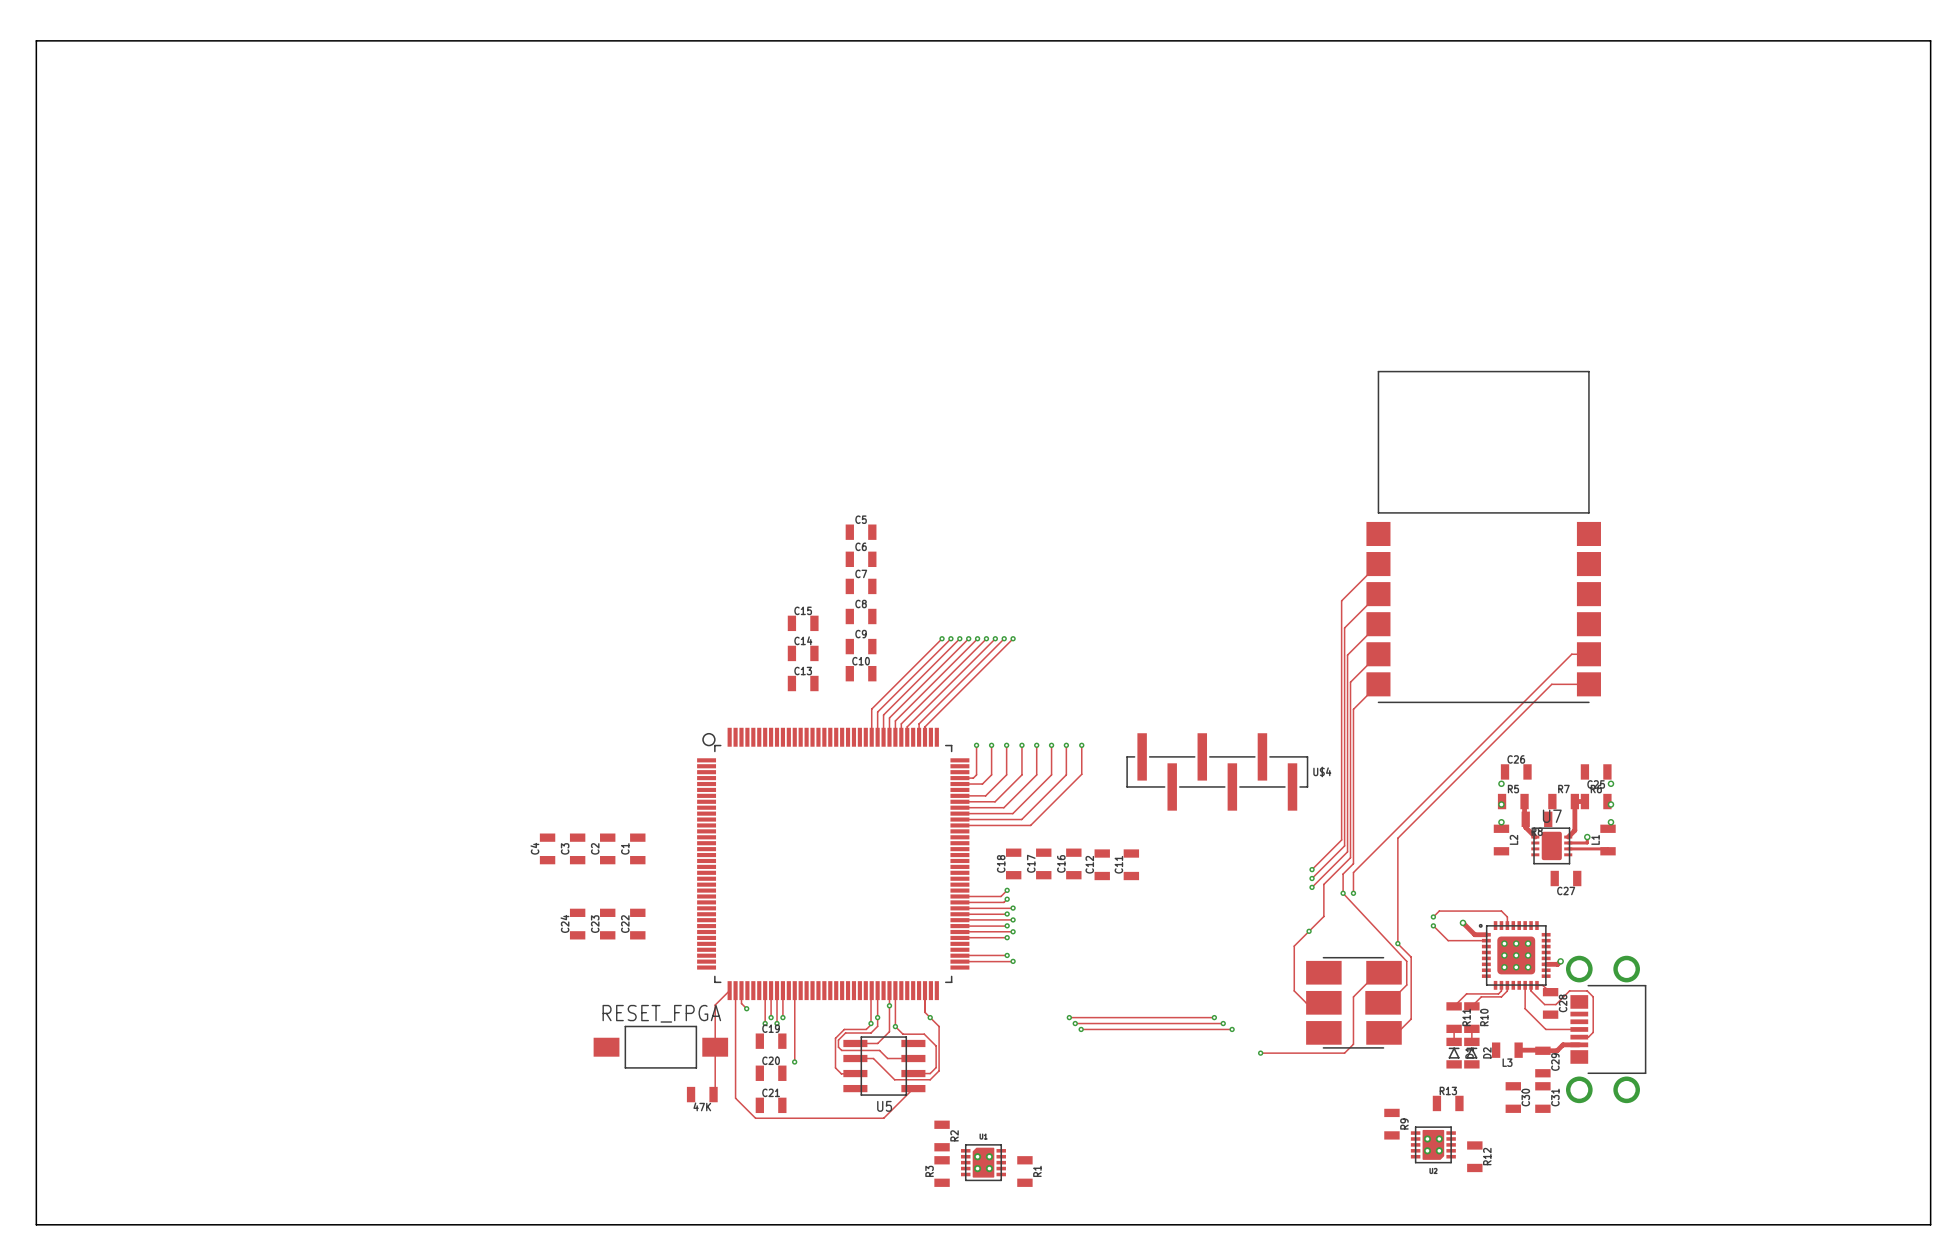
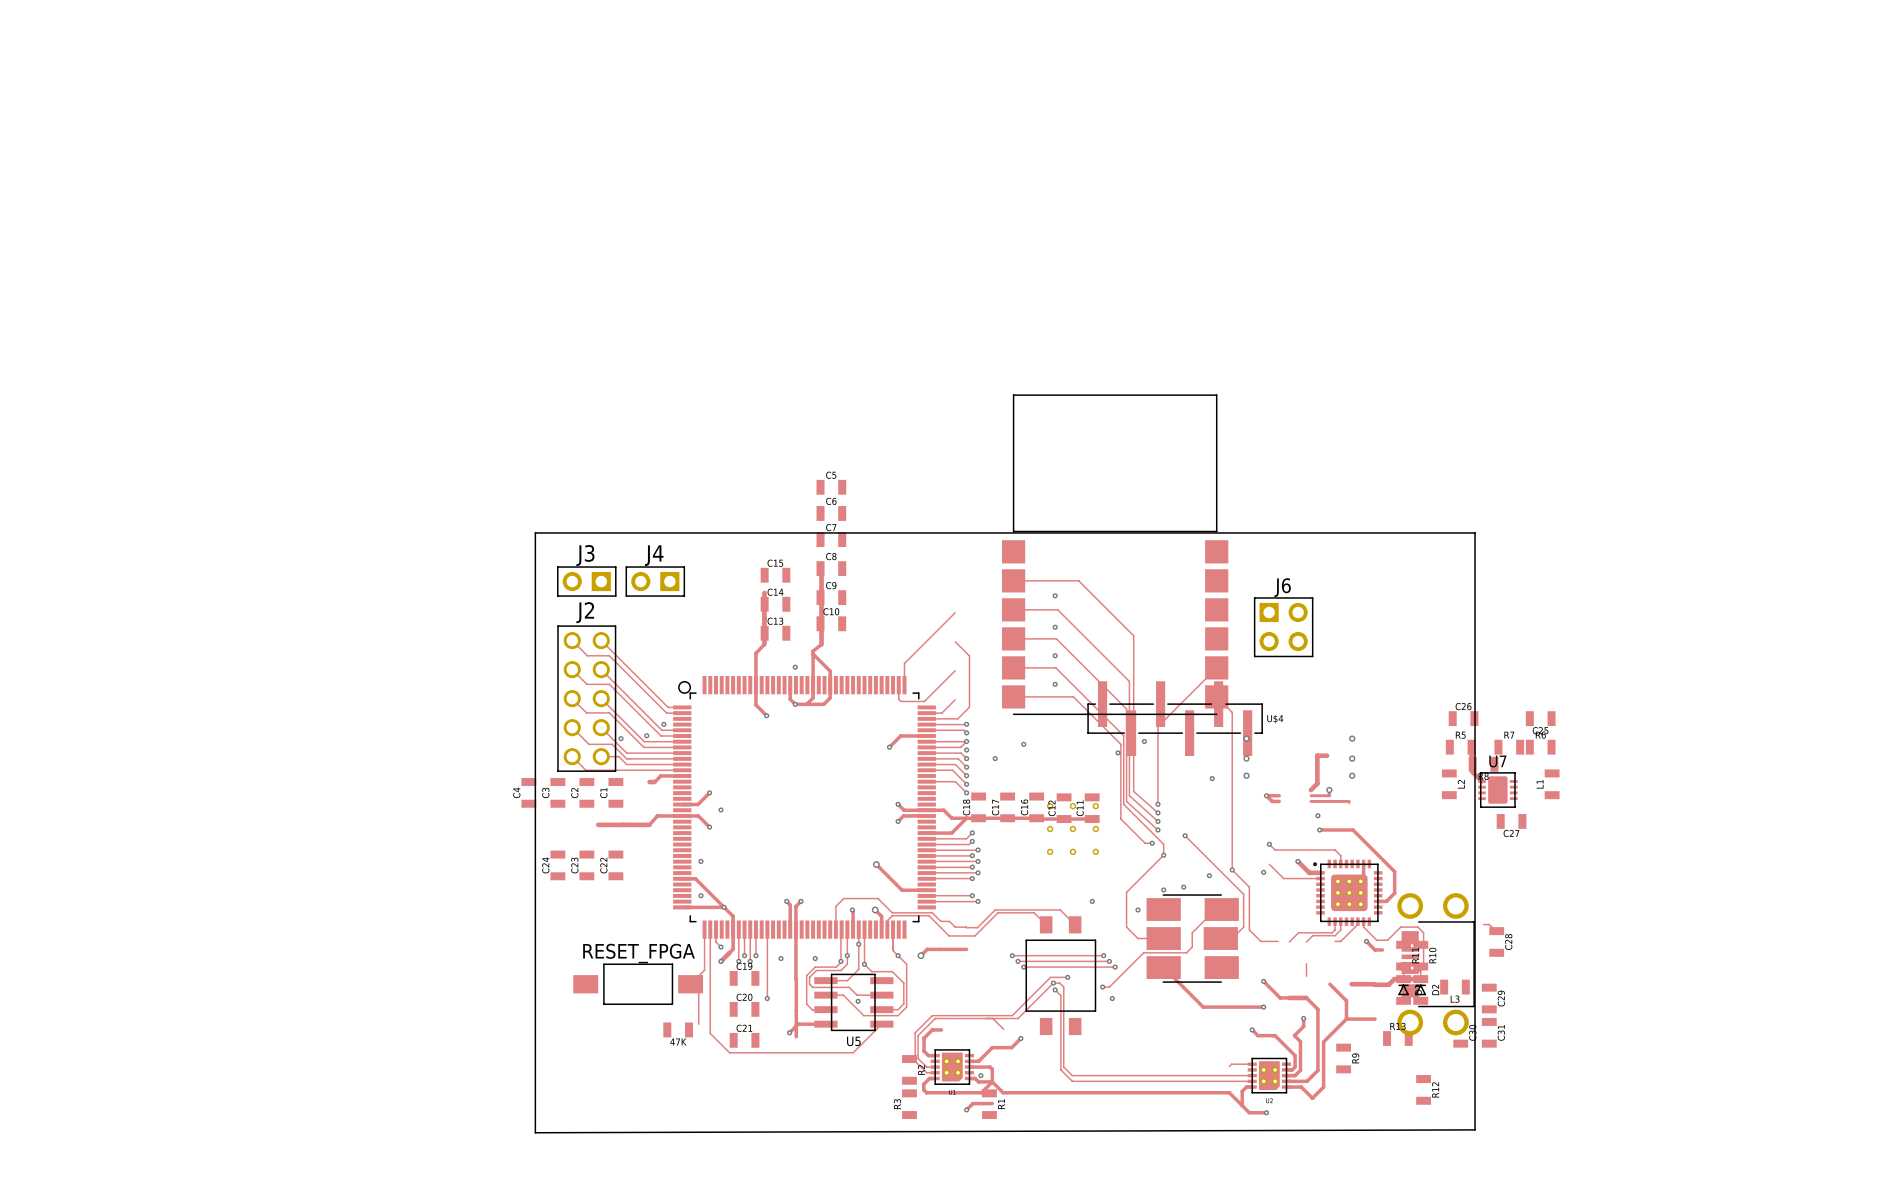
board edge: (36, 40) (1930, 40) (1930, 1224) (36, 1224) (36, 40) -> none
part: (1483, 536) -> none
track: (1378, 564) (1341, 600) (1341, 840) (1312, 869) -> none
board edge: none -> (535, 532) (1475, 532) (1475, 1129) (535, 1132) (535, 532)
track: (1378, 594) (1344, 627) (1344, 845) (1312, 878) -> none
part: none -> (1115, 554)
track: none -> (821, 564) (821, 644) (813, 651) (813, 697) (806, 704)
track: (1378, 624) (1347, 655) (1347, 851) (1312, 887) -> none
J3: none -> (586, 581)
J4: none -> (655, 581)
track: none -> (1013, 580) (1078, 580) (1133, 635) (1133, 791) (1157, 812)
track: (942, 638) (871, 709) (871, 737) -> none
via: (942, 638) -> none
track: (950, 638) (877, 712) (877, 737) -> none
via: (950, 638) -> none
track: (959, 638) (883, 715) (883, 737) -> none
via: (959, 638) -> none
track: (968, 638) (889, 717) (889, 737) -> none
via: (968, 638) -> none
track: (977, 638) (895, 720) (895, 737) -> none
via: (977, 638) -> none
track: (986, 638) (901, 723) (901, 737) -> none
via: (986, 638) -> none
track: (995, 638) (907, 726) (907, 737) -> none
via: (995, 638) -> none
track: (1004, 638) (919, 723) (919, 737) -> none
via: (1004, 638) -> none
track: (1013, 638) (925, 726) (925, 737) -> none
via: (1013, 638) -> none
track: none -> (764, 592) (764, 644) (755, 653) (755, 705) (766, 715)
via: none -> (1055, 595)
track: (1378, 654) (1350, 682) (1350, 857) (1323, 884) (1323, 916) (1294, 946) -> (1216, 696) (1232, 712) (1232, 869) (1249, 887)
track: (1588, 654) (1571, 654) (1353, 872) (1353, 893) -> none
track: none -> (1013, 609) (1057, 609) (1129, 681) (1129, 795) (1157, 821)
track: none -> (955, 612) (904, 663) (904, 685)
via: none -> (1055, 627)
J6: none -> (1283, 627)
track: (1378, 684) (1353, 709) (1353, 863) (1343, 874) (1343, 893) (1406, 961) (1406, 982) -> none
track: (1588, 684) (1551, 684) (1397, 838) (1397, 857) -> (1310, 801) (1349, 801)
track: none -> (1013, 638) (1056, 638) (1126, 709) (1126, 801) (1157, 830)
track: none -> (572, 640) (587, 655) (609, 655) (666, 713) (682, 713)
track: none -> (601, 640) (668, 707) (682, 707)
track: none -> (955, 641) (969, 656) (969, 707) (957, 718) (926, 718)
track: none -> (813, 654) (830, 671) (830, 697) (823, 704) (795, 704) (790, 699) (790, 685)
via: none -> (1055, 655)
via: none -> (795, 667)
track: none -> (1013, 667) (1055, 667) (1123, 735) (1123, 804) (1163, 844) (1163, 855) (1126, 892) (1126, 927) (1137, 938) (1163, 938)
track: none -> (1216, 667) (1157, 726) (1157, 804)
track: none -> (572, 669) (587, 684) (609, 684) (661, 735) (682, 735)
track: none -> (601, 669) (661, 730) (682, 730)
track: none -> (955, 670) (924, 701) (900, 701) (898, 699) (898, 685)
via: none -> (1055, 684)
track: (976, 745) (976, 774) (973, 778) -> (966, 724) (939, 724)
via: (976, 745) -> none
track: (991, 745) (991, 774) (982, 784) -> (966, 732) (964, 730) (948, 730)
via: (991, 745) -> none
track: (1006, 745) (1006, 774) (985, 795) -> (966, 741) (951, 741)
via: (1006, 745) -> none
track: (1021, 745) (1021, 774) (1001, 795) -> none
via: (1021, 745) -> none
track: (1036, 745) (1036, 774) (1003, 807) (995, 807) -> (966, 758) (961, 753)
via: (1036, 745) -> none
track: (1051, 745) (1051, 774) (1012, 813) (992, 813) -> (966, 767) (958, 758)
via: (1051, 745) -> none
track: (1066, 745) (1066, 774) (1021, 819) (989, 819) -> (966, 775) (955, 764)
via: (1066, 745) -> none
track: (1081, 745) (1081, 774) (1030, 825) (986, 825) -> (966, 784) (952, 770)
via: (1081, 745) -> none
track: none -> (1013, 696) (1073, 696) (1120, 744) (1120, 818) (1145, 843) (1152, 843)
track: none -> (572, 698) (586, 712) (609, 712) (643, 747) (682, 747)
J2: none -> (586, 698)
track: none -> (601, 698) (644, 741) (682, 741)
track: none -> (955, 699) (941, 713) (926, 713)
via: none -> (795, 704)
via: none -> (766, 715)
via: none -> (663, 724)
via: none -> (966, 724)
track: none -> (572, 727) (588, 744) (612, 744) (626, 758) (682, 758)
track: none -> (601, 727) (626, 753) (682, 753)
via: (1501, 783) -> none
via: (1610, 783) -> none
via: none -> (966, 732)
via: none -> (646, 735)
track: none -> (926, 735) (900, 735) (889, 747)
via: none -> (621, 738)
via: none -> (1246, 738)
via: none -> (1352, 738)
via: none -> (966, 741)
via: none -> (1144, 741)
via: none -> (1023, 744)
via: none -> (889, 747)
track: (1584, 801) (1574, 801) (1574, 830) (1568, 837) -> (1327, 755) (1317, 755) (1317, 783) (1310, 790)
via: none -> (966, 750)
via: (1501, 804) -> none
via: (1610, 804) -> none
via: none -> (1117, 752)
track: none -> (572, 756) (585, 770) (682, 770)
track: none -> (601, 756) (618, 756) (626, 764) (682, 764)
via: none -> (966, 758)
via: none -> (995, 758)
via: none -> (1246, 758)
via: none -> (1352, 758)
via: none -> (966, 767)
via: (1501, 822) -> none
via: (1610, 822) -> none
track: none -> (682, 775) (660, 775) (654, 782) (649, 782)
via: none -> (966, 775)
via: none -> (1246, 775)
via: none -> (1352, 775)
via: none -> (1212, 778)
track: none -> (926, 781) (955, 781) (966, 792)
track: (1587, 837) (1587, 842) (1568, 842) -> (1329, 790) (1329, 795) (1310, 795)
via: (1587, 837) -> none
via: none -> (966, 784)
via: none -> (1329, 790)
track: none -> (709, 792) (697, 804) (682, 804)
via: none -> (709, 792)
via: none -> (966, 792)
track: (1568, 848) (1608, 848) (1608, 851) -> none
via: none -> (1266, 795)
track: none -> (1279, 795) (1266, 795) (1272, 801) (1279, 801)
track: none -> (898, 804) (904, 810) (943, 810) (951, 818) (1092, 819)
via: none -> (898, 804)
via: none -> (1157, 804)
track: (1397, 860) (1397, 943) (1411, 957) (1411, 1019) (1397, 1032) (1384, 1032) -> none
via: none -> (721, 810)
via: none -> (1157, 812)
via: (1312, 869) -> none
track: none -> (926, 815) (903, 815) (898, 821)
via: none -> (1317, 815)
track: none -> (966, 818) (951, 833) (926, 833)
via: none -> (898, 821)
via: none -> (1157, 821)
via: (1312, 878) -> none
track: none -> (598, 824) (649, 824) (657, 815) (698, 815) (709, 827)
via: none -> (709, 827)
part: none -> (1072, 828)
via: none -> (1157, 830)
via: (1312, 887) -> none
track: none -> (1319, 830) (1352, 830) (1394, 871) (1394, 893) (1386, 901) (1378, 901)
via: none -> (1319, 830)
track: none -> (1185, 835) (1243, 894) (1243, 927) (1232, 938) (1220, 938)
via: none -> (1185, 835)
via: (1343, 893) -> none
via: (1353, 893) -> none
via: none -> (1152, 843)
track: none -> (1269, 844) (1275, 850) (1335, 850) (1340, 855) (1340, 864)
via: none -> (1269, 844)
via: none -> (1163, 855)
track: (1433, 916) (1439, 911) (1501, 911) (1507, 916) (1507, 925) -> none
via: (1433, 916) -> none
via: none -> (701, 861)
via: none -> (1297, 861)
track: none -> (1363, 864) (1363, 878)
track: (1462, 922) (1474, 934) (1486, 934) -> (1297, 861) (1309, 872) (1320, 872)
via: (1462, 922) -> none
track: none -> (876, 864) (902, 890) (926, 890)
via: none -> (876, 864)
track: (1433, 925) (1448, 940) (1486, 940) -> (1269, 864) (1283, 878) (1320, 878)
via: (1433, 925) -> none
via: none -> (1232, 869)
via: none -> (1209, 875)
track: none -> (682, 878) (695, 878) (733, 916) (733, 949) (720, 961)
via: (1397, 943) -> none
via: none -> (1183, 887)
via: none -> (1163, 889)
via: none -> (701, 895)
part position: (1514, 955) -> (1347, 892)
track: none -> (786, 901) (790, 904) (790, 929)
via: none -> (786, 901)
track: none -> (800, 901) (795, 906) (796, 1036)
via: none -> (800, 901)
via: none -> (1092, 901)
track: (1560, 961) (1557, 964) (1546, 964) -> none
via: (1560, 961) -> none
track: none -> (682, 907) (724, 907)
via: none -> (724, 907)
track: none -> (1221, 909) (1215, 909) (1192, 932) (1192, 947) (1186, 952) (1143, 952) (1109, 987) (1102, 987)
track: none -> (852, 909) (853, 929)
via: none -> (852, 909)
track: none -> (875, 909) (881, 916) (881, 929)
via: none -> (875, 909)
via: none -> (1137, 909)
track: (1384, 972) (1377, 972) (1353, 996) (1353, 1025) -> none
track: none -> (1335, 921) (1335, 929) (1332, 932) (1298, 932) (1289, 941)
track: none -> (1340, 921) (1340, 929) (1335, 935) (1312, 935) (1306, 941)
track: none -> (1046, 924) (1034, 912) (998, 912) (974, 935) (949, 935) (928, 915) (892, 915) (887, 920) (887, 929)
track: none -> (1075, 924) (1060, 909) (995, 909) (977, 927) (955, 927) (949, 921) (940, 921) (932, 912) (892, 912) (878, 898) (843, 898) (835, 906) (835, 929)
track: (1501, 985) (1501, 990) (1498, 993) (1466, 993) (1454, 1006) -> none
track: (1507, 985) (1507, 990) (1501, 996) (1481, 996) (1471, 1006) -> none
track: (1525, 985) (1525, 1008) (1545, 1029) (1579, 1029) -> none
track: (1531, 985) (1531, 990) (1544, 1004) (1555, 1004) (1569, 990) (1587, 990) (1593, 996) (1593, 1032) (1588, 1037) (1579, 1037) -> (1363, 921) (1363, 927) (1376, 940) (1387, 940) (1400, 927) (1417, 927) (1423, 932) (1423, 967) (1419, 971) (1410, 971)
track: (729, 990) (715, 1005) (715, 1092) (713, 1094) -> (704, 929) (704, 970) (690, 984) (698, 992) (698, 1024)
part position: (1353, 1002) -> (1192, 938)
track: none -> (1366, 941) (1375, 949) (1382, 949)
via: none -> (1366, 941)
track: none -> (966, 949) (927, 949) (920, 955)
via: none -> (920, 955)
track: none -> (1012, 955) (1032, 955)
via: none -> (1012, 955)
via: (1069, 1017) -> none
track: (1143, 1017) (1214, 1017) -> none
via: none -> (1103, 955)
via: (1214, 1017) -> none
via: none -> (780, 958)
via: none -> (815, 958)
via: none -> (721, 961)
track: none -> (1018, 961) (1038, 961)
via: none -> (1018, 961)
via: (1075, 1023) -> none
track: (1149, 1023) (1223, 1023) -> none
via: none -> (1109, 961)
via: (1223, 1023) -> none
track: none -> (1023, 967) (1043, 967)
via: none -> (1023, 967)
via: (1081, 1029) -> none
track: (1155, 1029) (1232, 1029) -> none
via: none -> (1115, 967)
track: none -> (1163, 967) (1203, 1007) (1263, 1007)
via: (1232, 1029) -> none
part position: (1606, 1029) -> (1436, 964)
part: none -> (1060, 975)
track: (1353, 1038) (1353, 1044) (1344, 1053) (1260, 1053) -> none
track: none -> (1067, 977) (1050, 977) (1012, 1015) (932, 1015) (915, 1032) (915, 1061) (926, 1072) (935, 1072)
via: none -> (1067, 977)
track: none -> (1263, 981) (1280, 997) (1306, 997) (1317, 1009) (1317, 1070) (1307, 1081) (1286, 1081)
via: none -> (1263, 981)
track: (1579, 1044) (1563, 1044) (1557, 1050) (1518, 1050) -> (1410, 979) (1394, 979) (1388, 984) (1351, 984)
via: none -> (1053, 983)
track: none -> (1329, 984) (1346, 1000) (1346, 1019)
via: none -> (1102, 987)
track: none -> (1055, 989) (1060, 995) (1060, 1069) (1072, 1081) (1252, 1081)
via: none -> (1055, 989)
via: (1260, 1053) -> none
via: none -> (1112, 998)
via: none -> (858, 1001)
via: none -> (1263, 1007)
track: none -> (992, 1018) (1003, 1029)
track: none -> (1303, 1018) (1303, 1026) (1294, 1035) (1300, 1041) (1300, 1070) (1295, 1075) (1286, 1075)
via: none -> (1303, 1018)
track: none -> (1346, 1019) (1323, 1041) (1323, 1087) (1312, 1097) (1301, 1087) (1286, 1087)
track: none -> (1346, 1019) (1375, 1019)
track: none -> (825, 1024) (798, 1024) (789, 1032)
track: none -> (941, 1029) (932, 1029) (924, 1038) (924, 1051) (928, 1055) (935, 1055)
track: none -> (1252, 1029) (1257, 1035) (1275, 1035) (1295, 1055) (1295, 1067) (1292, 1069) (1286, 1069)
via: none -> (1252, 1029)
via: none -> (789, 1032)
track: none -> (1020, 1038) (1011, 1047) (992, 1047) (978, 1061) (969, 1061)
via: none -> (1020, 1038)
track: none -> (1252, 1064) (1231, 1064) (1229, 1066)
track: none -> (935, 1067) (926, 1067) (918, 1058) (918, 1035) (935, 1018) (1018, 1018) (1053, 983) (1059, 983) (1063, 987) (1063, 1067) (1072, 1075) (1252, 1075)
track: none -> (969, 1067) (990, 1067) (992, 1069) (992, 1081)
via: none -> (980, 1075)
track: none -> (935, 1078) (929, 1078) (923, 1084) (923, 1089) (926, 1092) (981, 1092) (992, 1081)
track: none -> (969, 1078) (975, 1078) (978, 1081) (992, 1081)
part position: (1433, 1144) -> (1269, 1075)
track: none -> (992, 1081) (1003, 1092) (1229, 1092) (1249, 1112) (1266, 1112)
track: none -> (1252, 1087) (1246, 1087) (1242, 1091) (1242, 1105)
part rotation: 0° (983, 1162) -> 180° (952, 1067)
part position: (983, 1162) -> (952, 1067)
track: none -> (992, 1103) (972, 1103) (966, 1109)
via: none -> (966, 1109)
via: none -> (1266, 1112)

